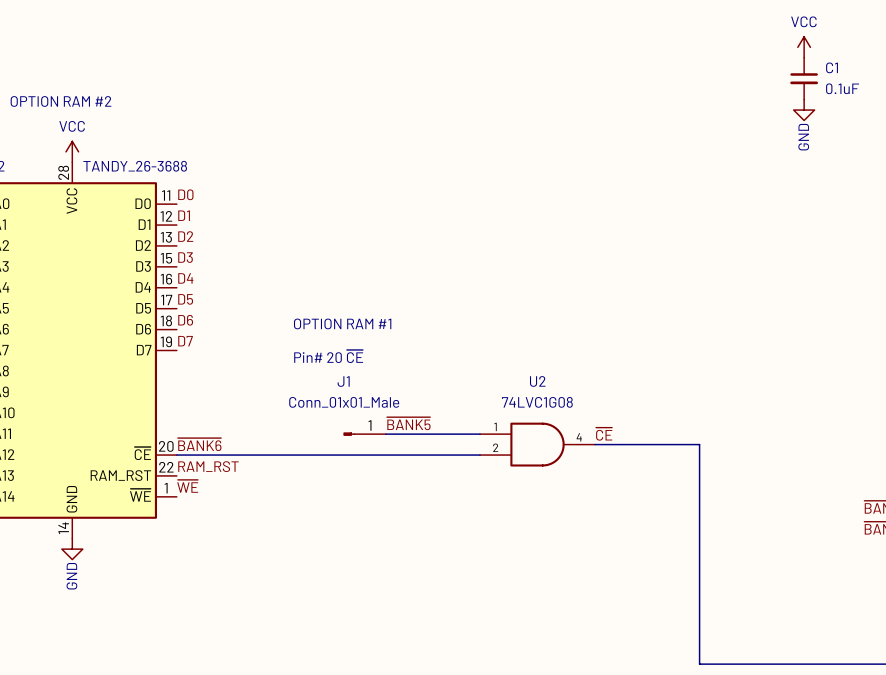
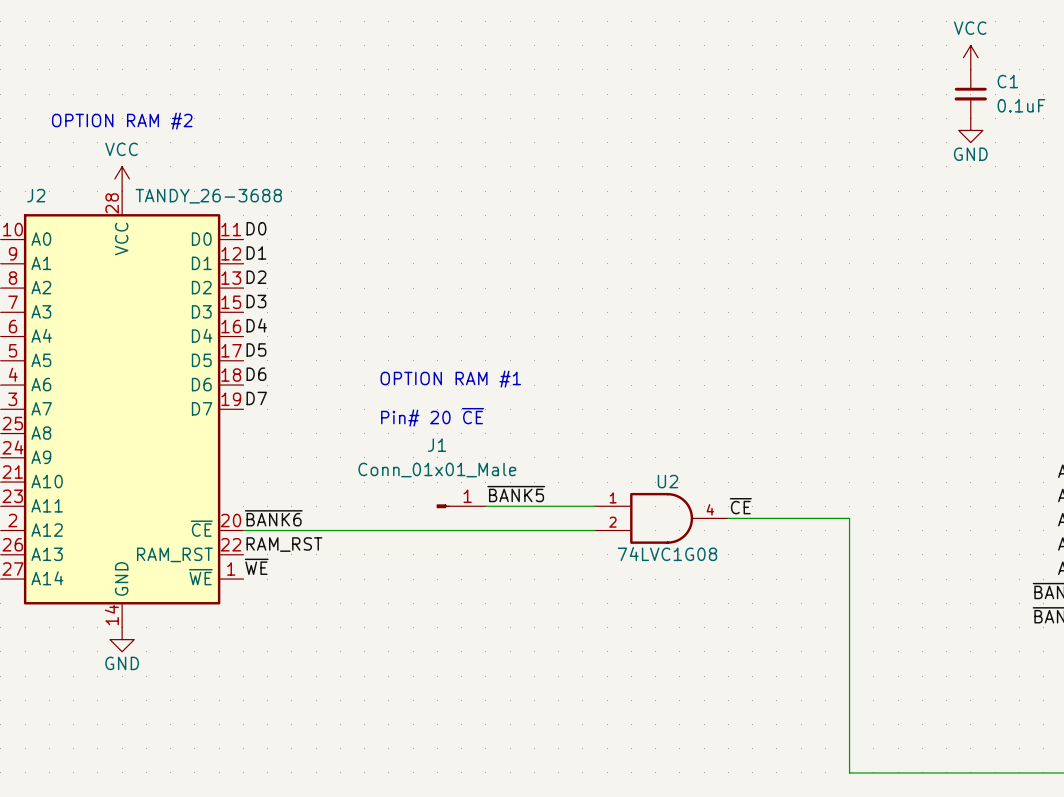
power symbol text rotation: 0° (803, 137) -> 90° clockwise (970, 154)
U2 name position: U2 (537, 381) -> U2 (667, 481)
U2 value position: 74LVC1G08 (537, 402) -> 74LVC1G08 (667, 554)
power symbol text rotation: 0° (71, 576) -> 90° clockwise (122, 663)

